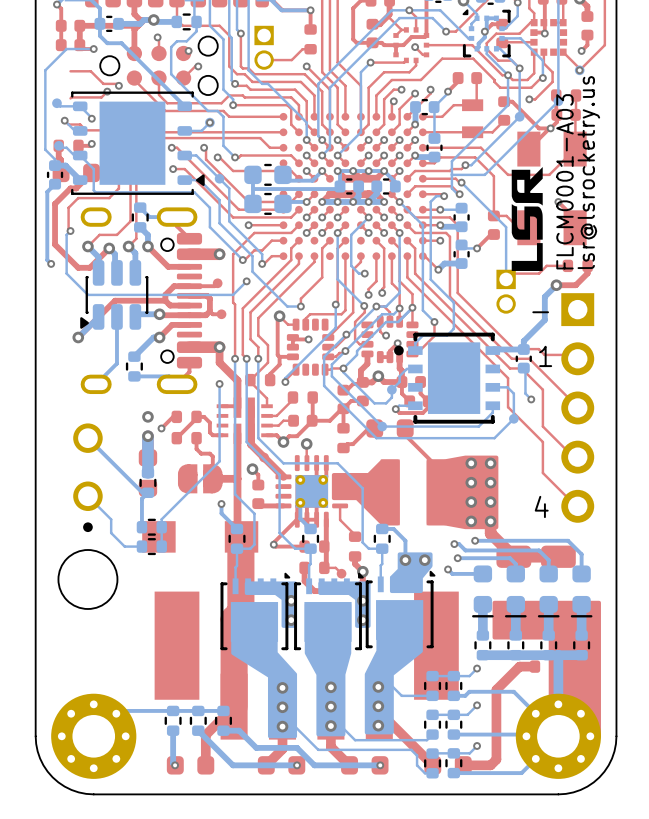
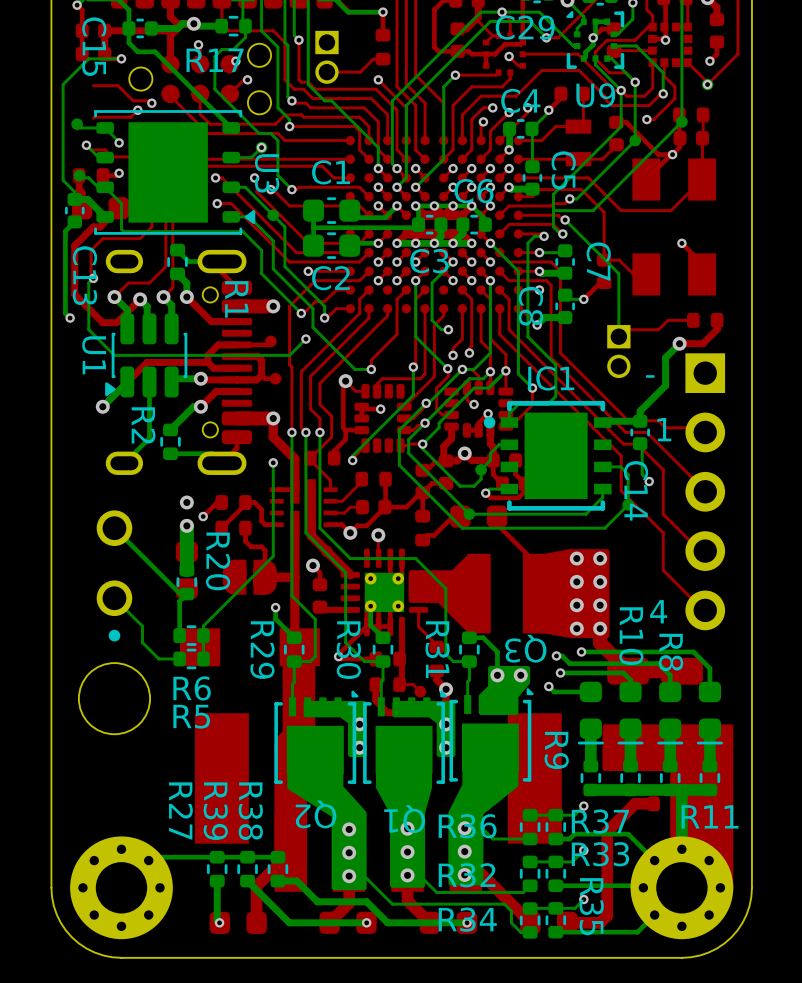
C29 name: none -> C29 (525, 27)
C15 name: none -> C15 (94, 46)
R17 name: none -> R17 (215, 60)
U9 name: none -> U9 (595, 95)
C4 name: none -> C4 (520, 100)
C5 name: none -> C5 (563, 170)
C1 name: none -> C1 (331, 172)
U3 name: none -> U3 (267, 173)
C6 name: none -> C6 (473, 191)
drawing: [511, 167, 543, 271] -> none
text: lsr@lsrocketry.us (588, 172) -> none
text: FLCM0001-A03 (564, 181) -> none
C3 name: none -> C3 (429, 261)
C7 name: none -> C7 (598, 261)
C13 name: none -> C13 (84, 275)
C2 name: none -> C2 (330, 278)
R1 name: none -> R1 (236, 299)
C8 name: none -> C8 (530, 306)
U1 name: none -> U1 (94, 355)
IC1 name: none -> IC1 (551, 378)
R2 name: none -> R2 (143, 425)
C14 name: none -> C14 (636, 490)
R20 name: none -> R20 (218, 561)
R10 name: none -> R10 (631, 636)
Q3 name: none -> Q3 (525, 648)
R29 name: none -> R29 (262, 650)
R30 name: none -> R30 (348, 650)
R31 name: none -> R31 (437, 649)
R8 name: none -> R8 (671, 652)
R6 name: none -> R6 (192, 688)
R5 name: none -> R5 (191, 716)
R9 name: none -> R9 (556, 750)
R39 name: none -> R39 (215, 811)
R38 name: none -> R38 (250, 811)
R27 name: none -> R27 (180, 810)
Q2 name: none -> Q2 (316, 814)
R11 name: none -> R11 (710, 816)
Q1 name: none -> Q1 (404, 819)
R37 name: none -> R37 (600, 821)
R36 name: none -> R36 (467, 826)
R33 name: none -> R33 (600, 854)
R32 name: none -> R32 (467, 875)
R35 name: none -> R35 (591, 906)
R34 name: none -> R34 (467, 919)

